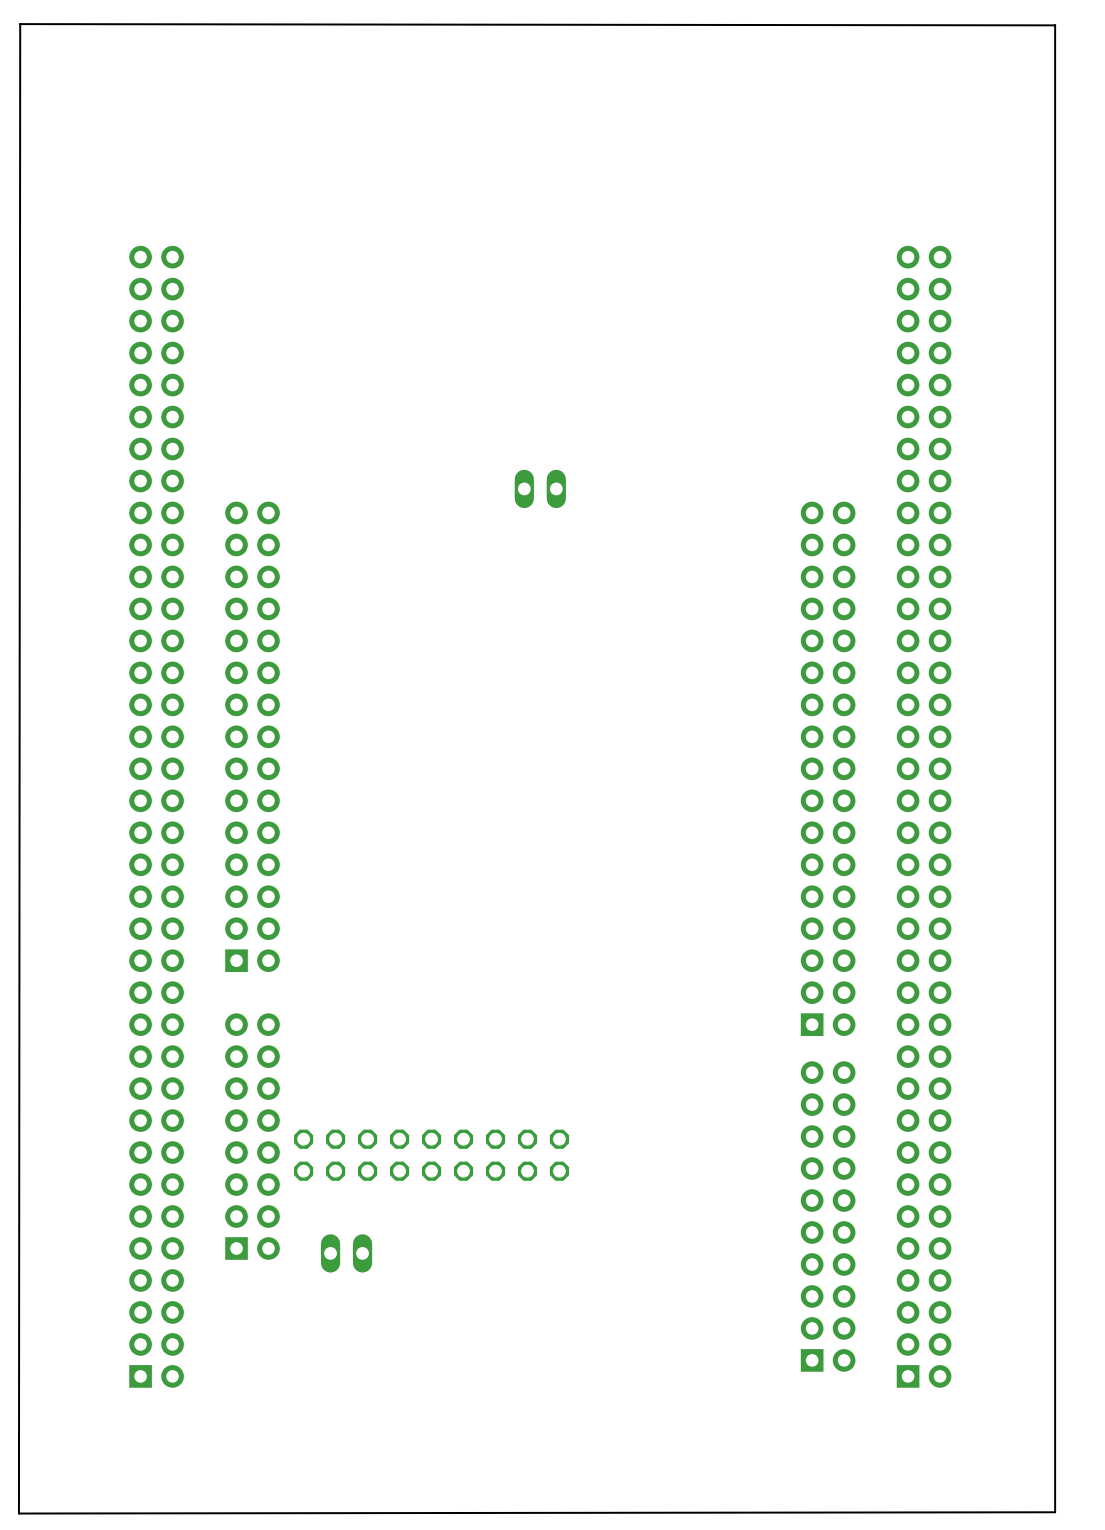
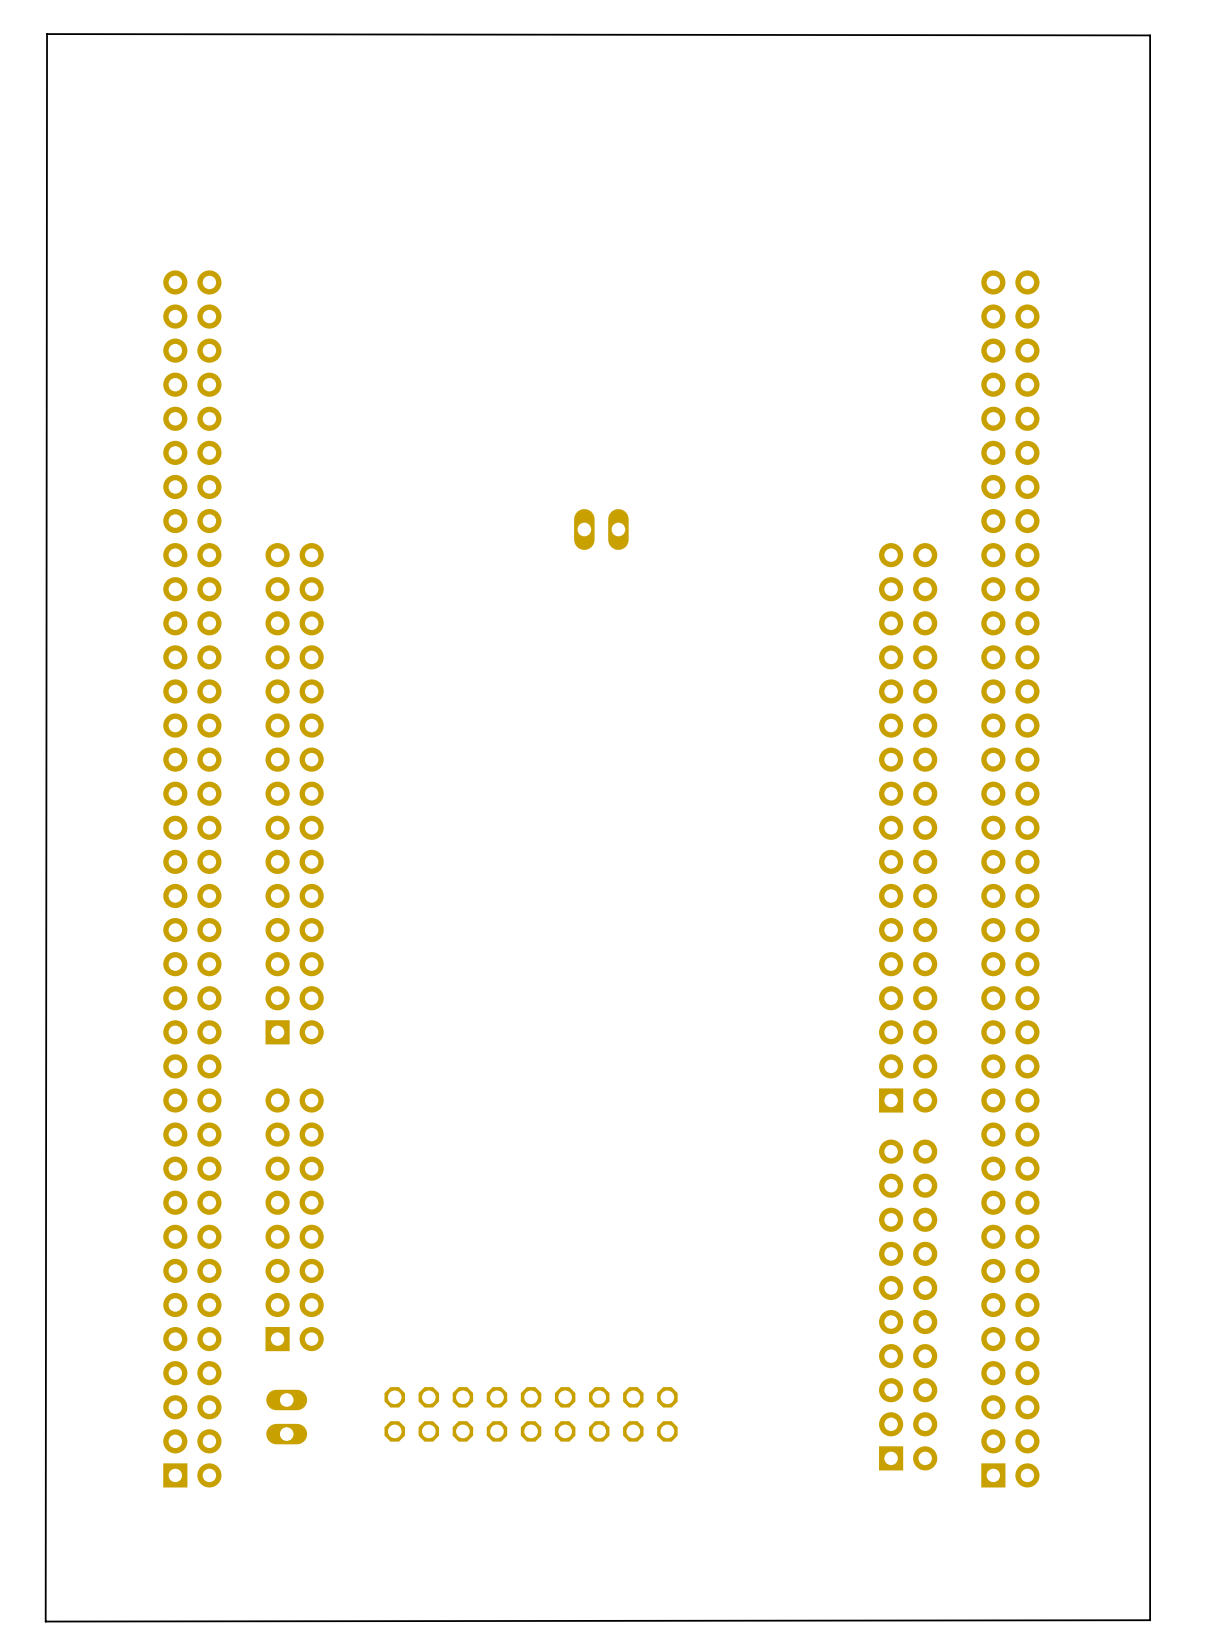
part position: (431, 1155) -> (531, 1414)
part rotation: 0° (346, 1253) -> 90° clockwise (286, 1417)
part position: (346, 1253) -> (286, 1417)

